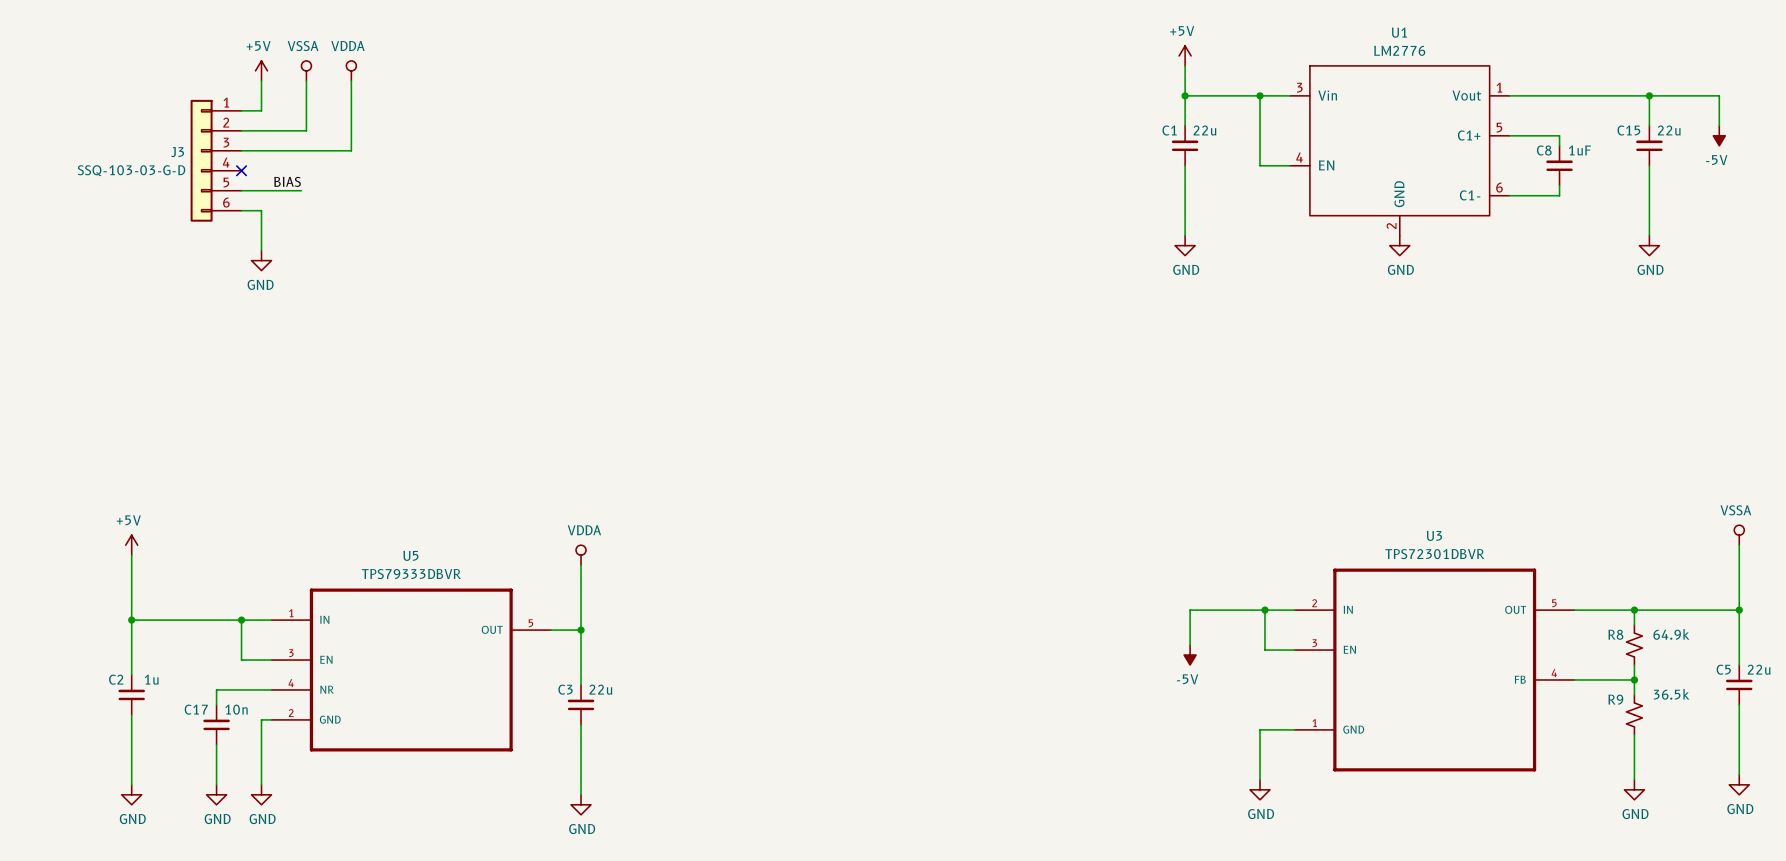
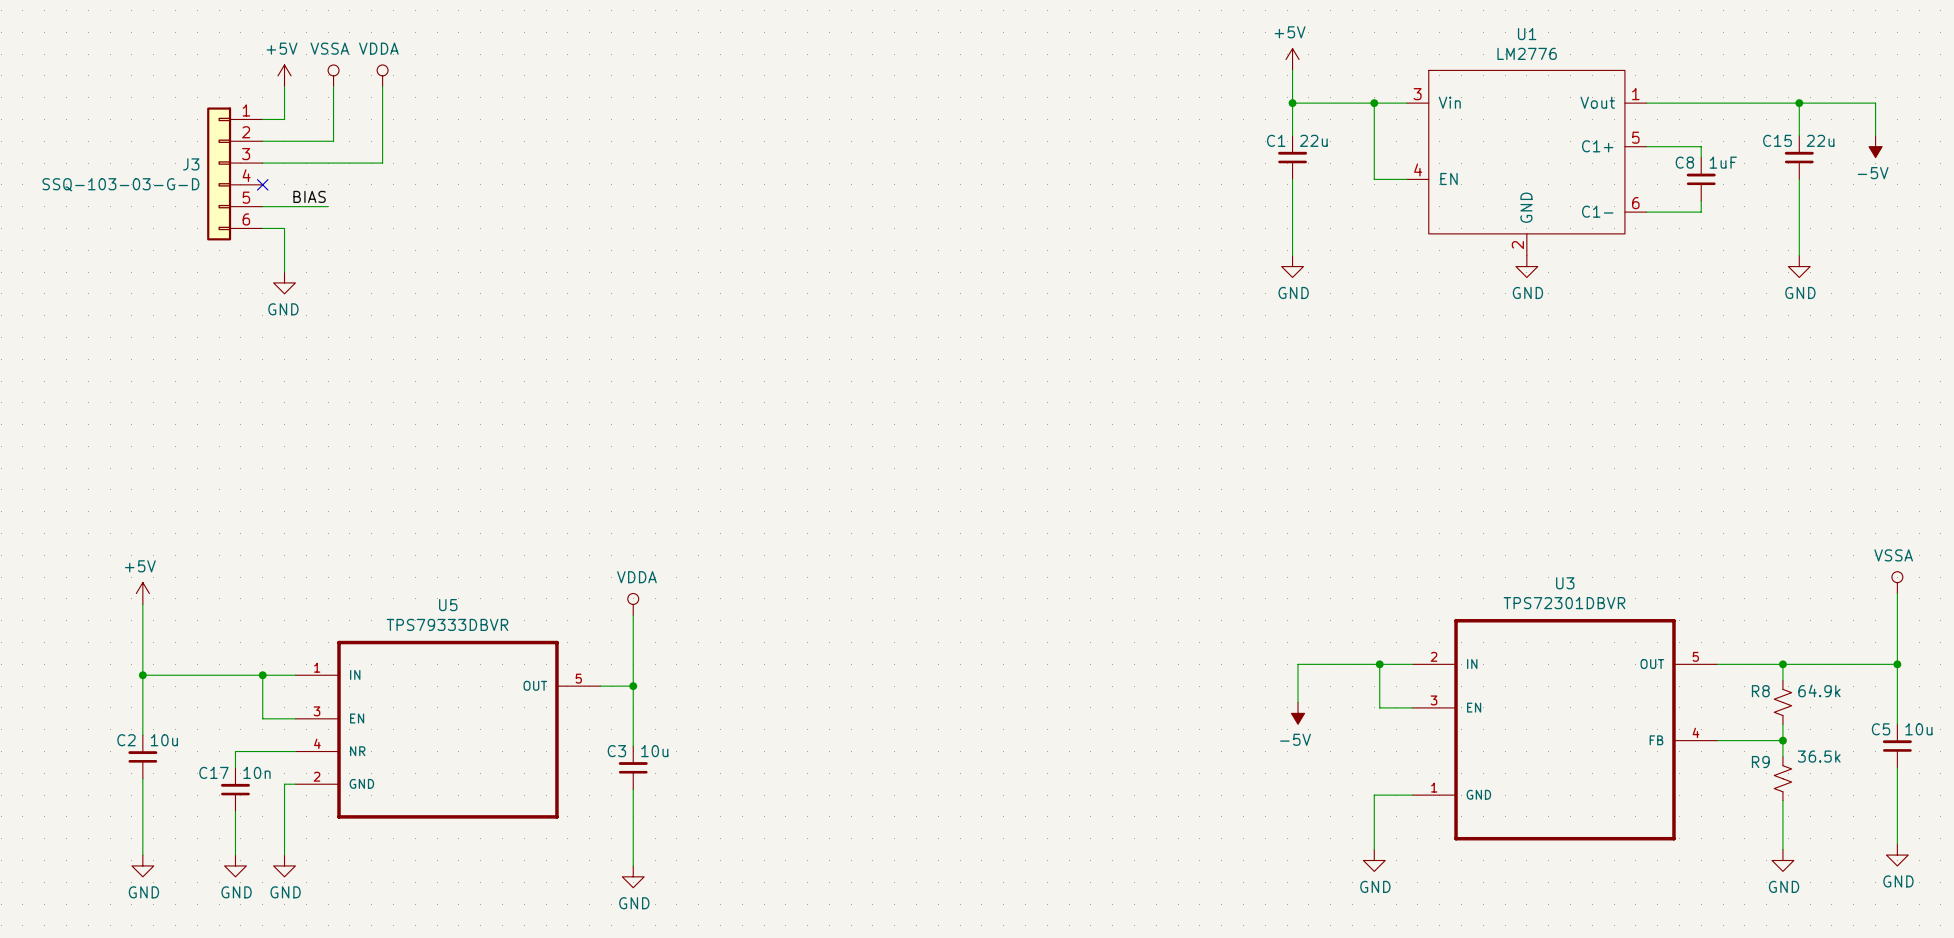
C5 value: 22u (1759, 669) -> 10u (1918, 729)
C2 value: 1u (151, 679) -> 10u (164, 740)
C3 value: 22u (600, 689) -> 10u (654, 751)

